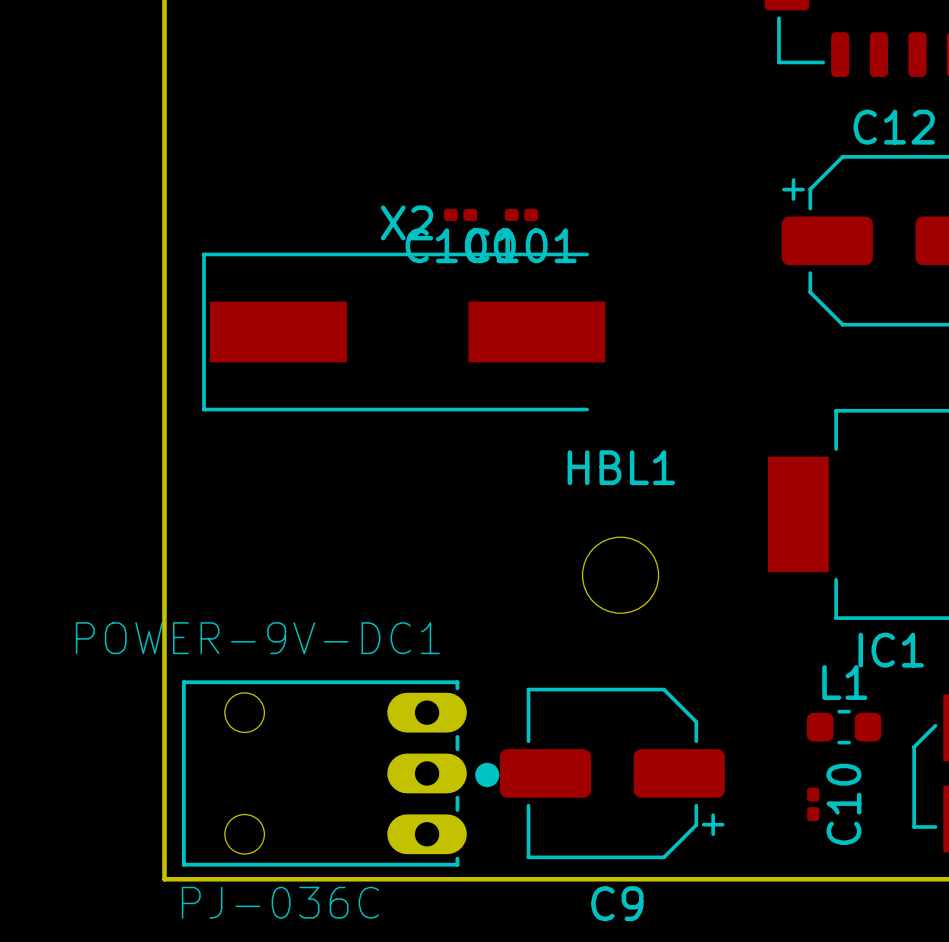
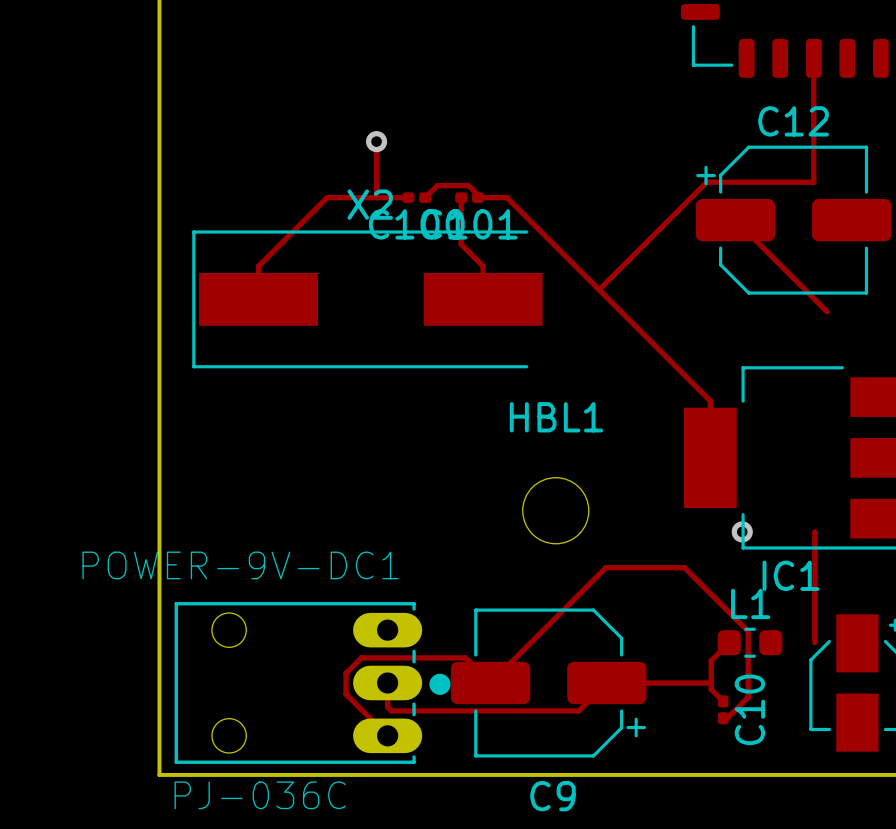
track: none -> (813, 58) (813, 182) (706, 182) (599, 289)
track: none -> (376, 141) (376, 197)
via: none -> (376, 141)
track: none -> (408, 197) (327, 197) (258, 266) (258, 299)
track: none -> (425, 197) (437, 185) (468, 185) (478, 195) (478, 197) (506, 197) (710, 401) (710, 457) (720, 467)
track: none -> (461, 197) (461, 244) (483, 266) (483, 299)
track: none -> (735, 220) (827, 311)
via: none -> (742, 531)
track: none -> (814, 531) (814, 642)
track: none -> (729, 642) (711, 660) (711, 689) (723, 701)
track: none -> (387, 682) (387, 706) (391, 710) (578, 710) (606, 682) (711, 682)
track: none -> (723, 718) (727, 718) (748, 697) (748, 631) (684, 567) (605, 567) (490, 682) (465, 657) (361, 657) (346, 673) (346, 694) (387, 735)

